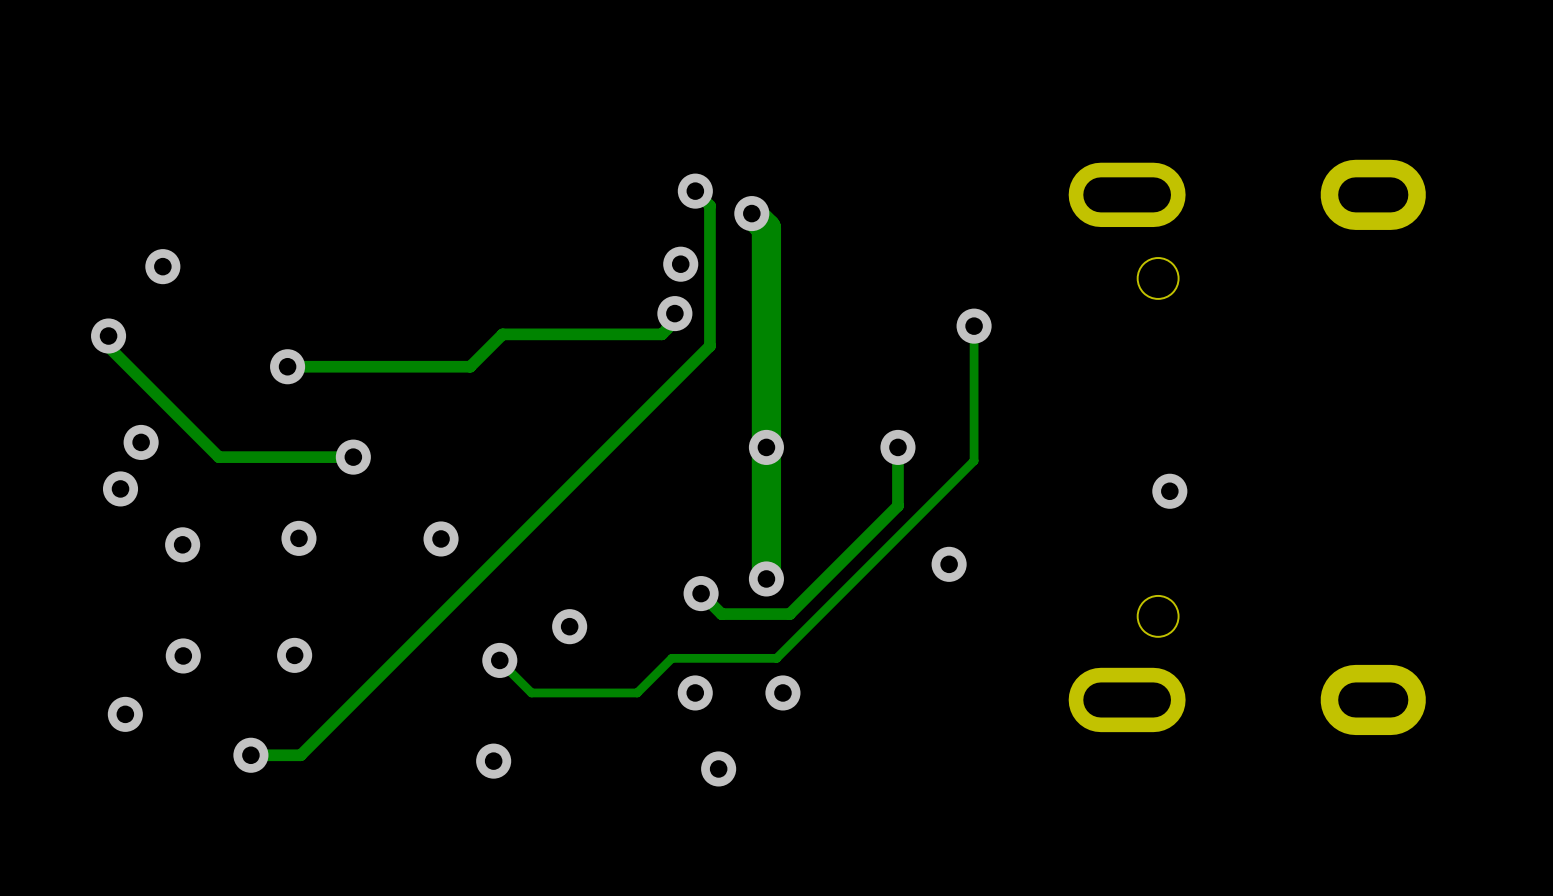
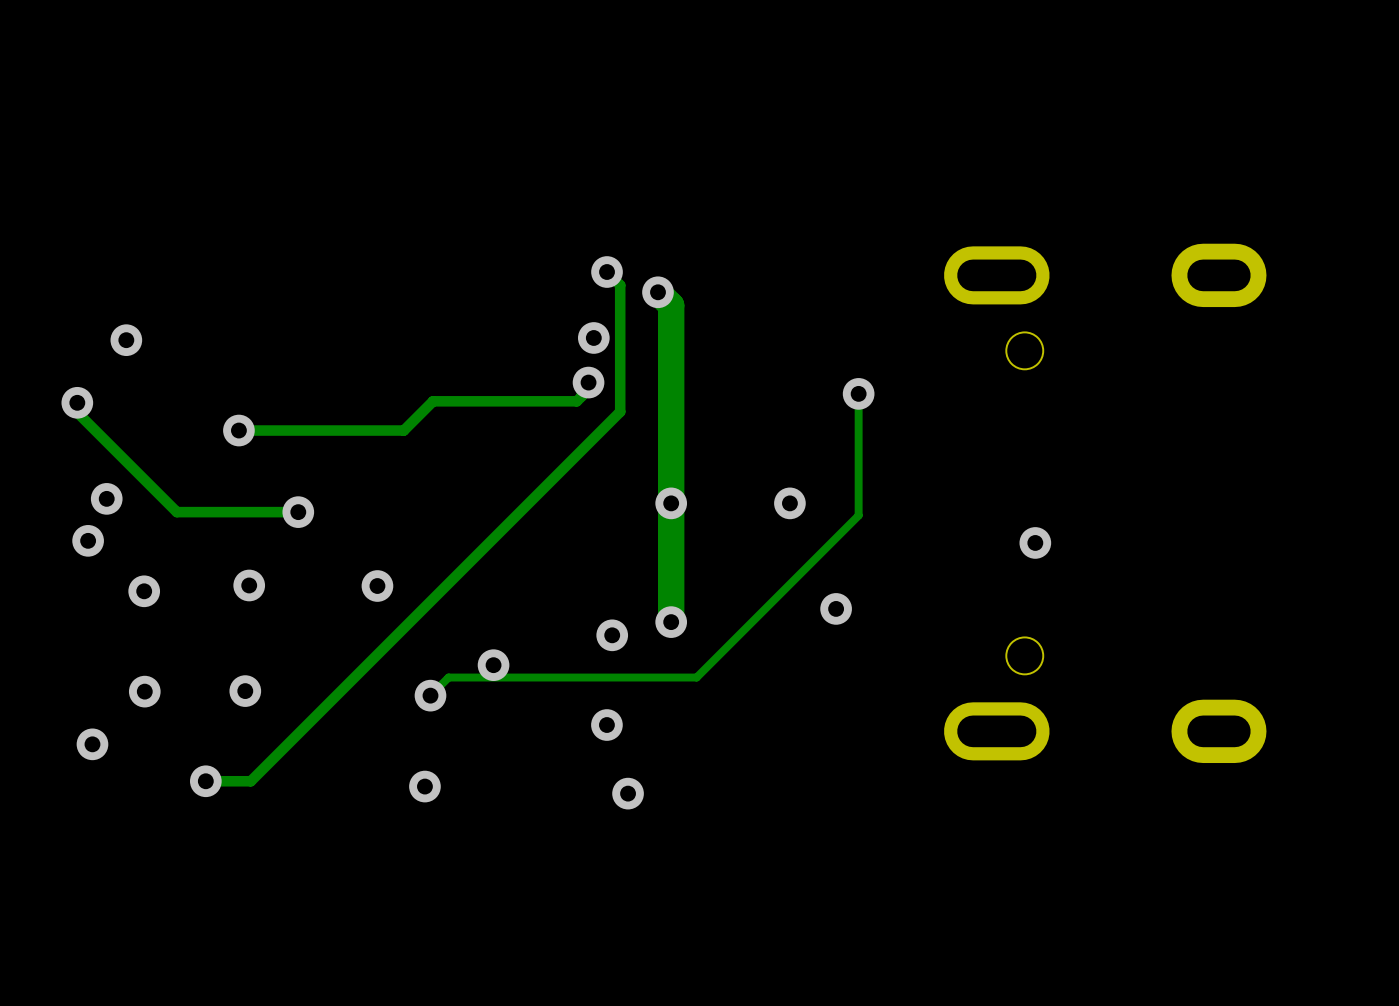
track: (897, 447) (897, 505) (789, 614) (721, 614) (701, 593) -> none
track: (794, 640) (776, 658) (671, 658) (637, 692) (531, 692) (499, 661) -> (696, 677) (448, 677) (430, 695)
via: (782, 692) -> none

